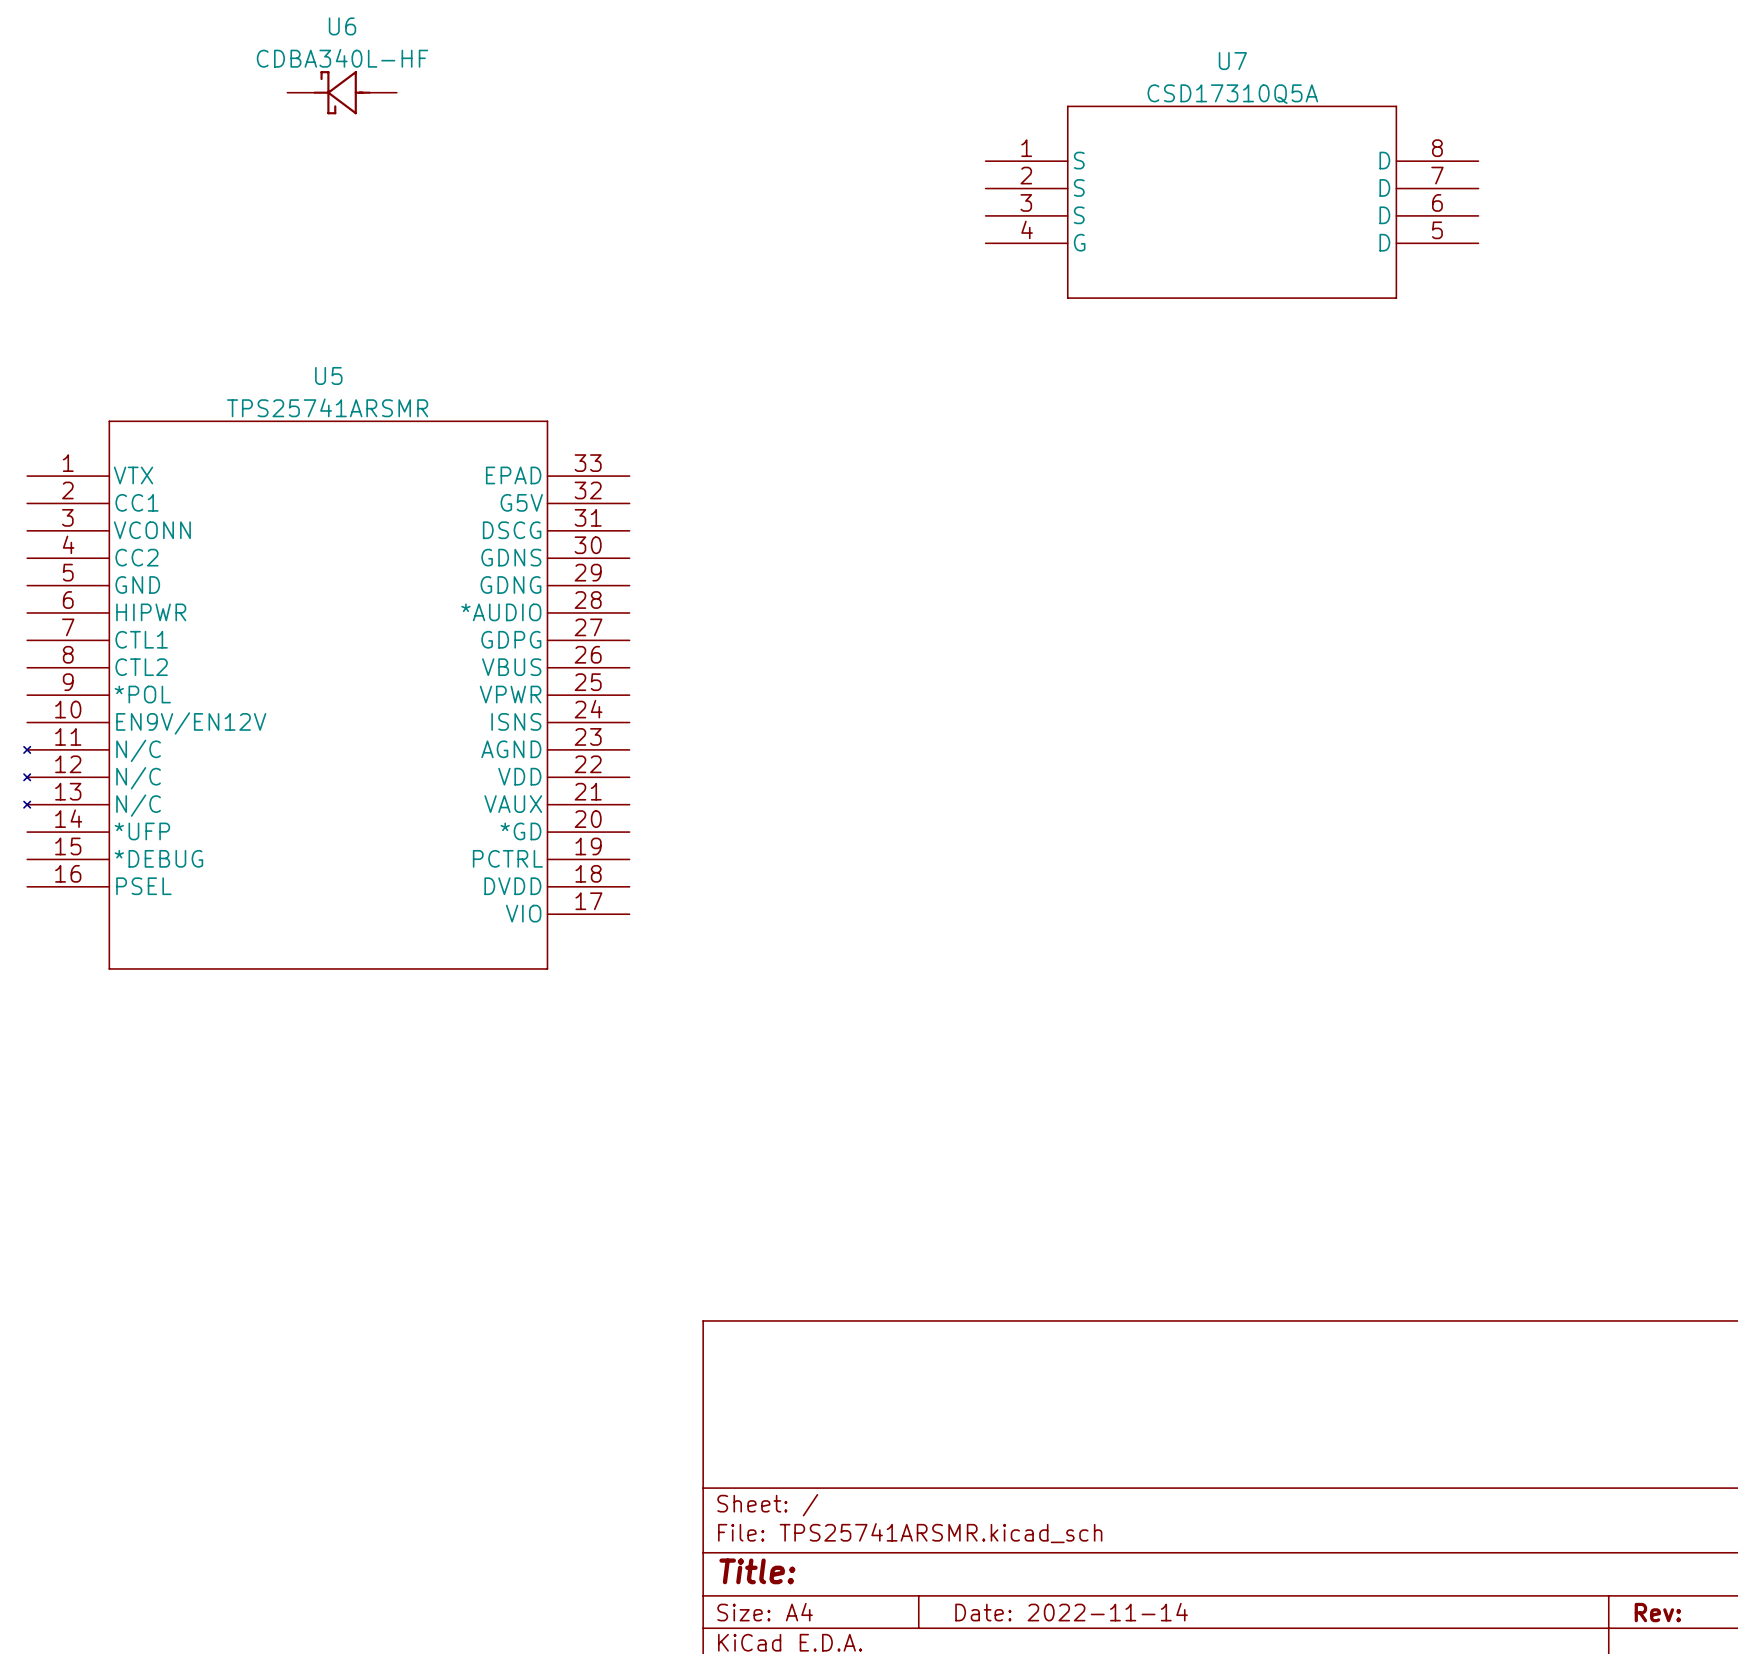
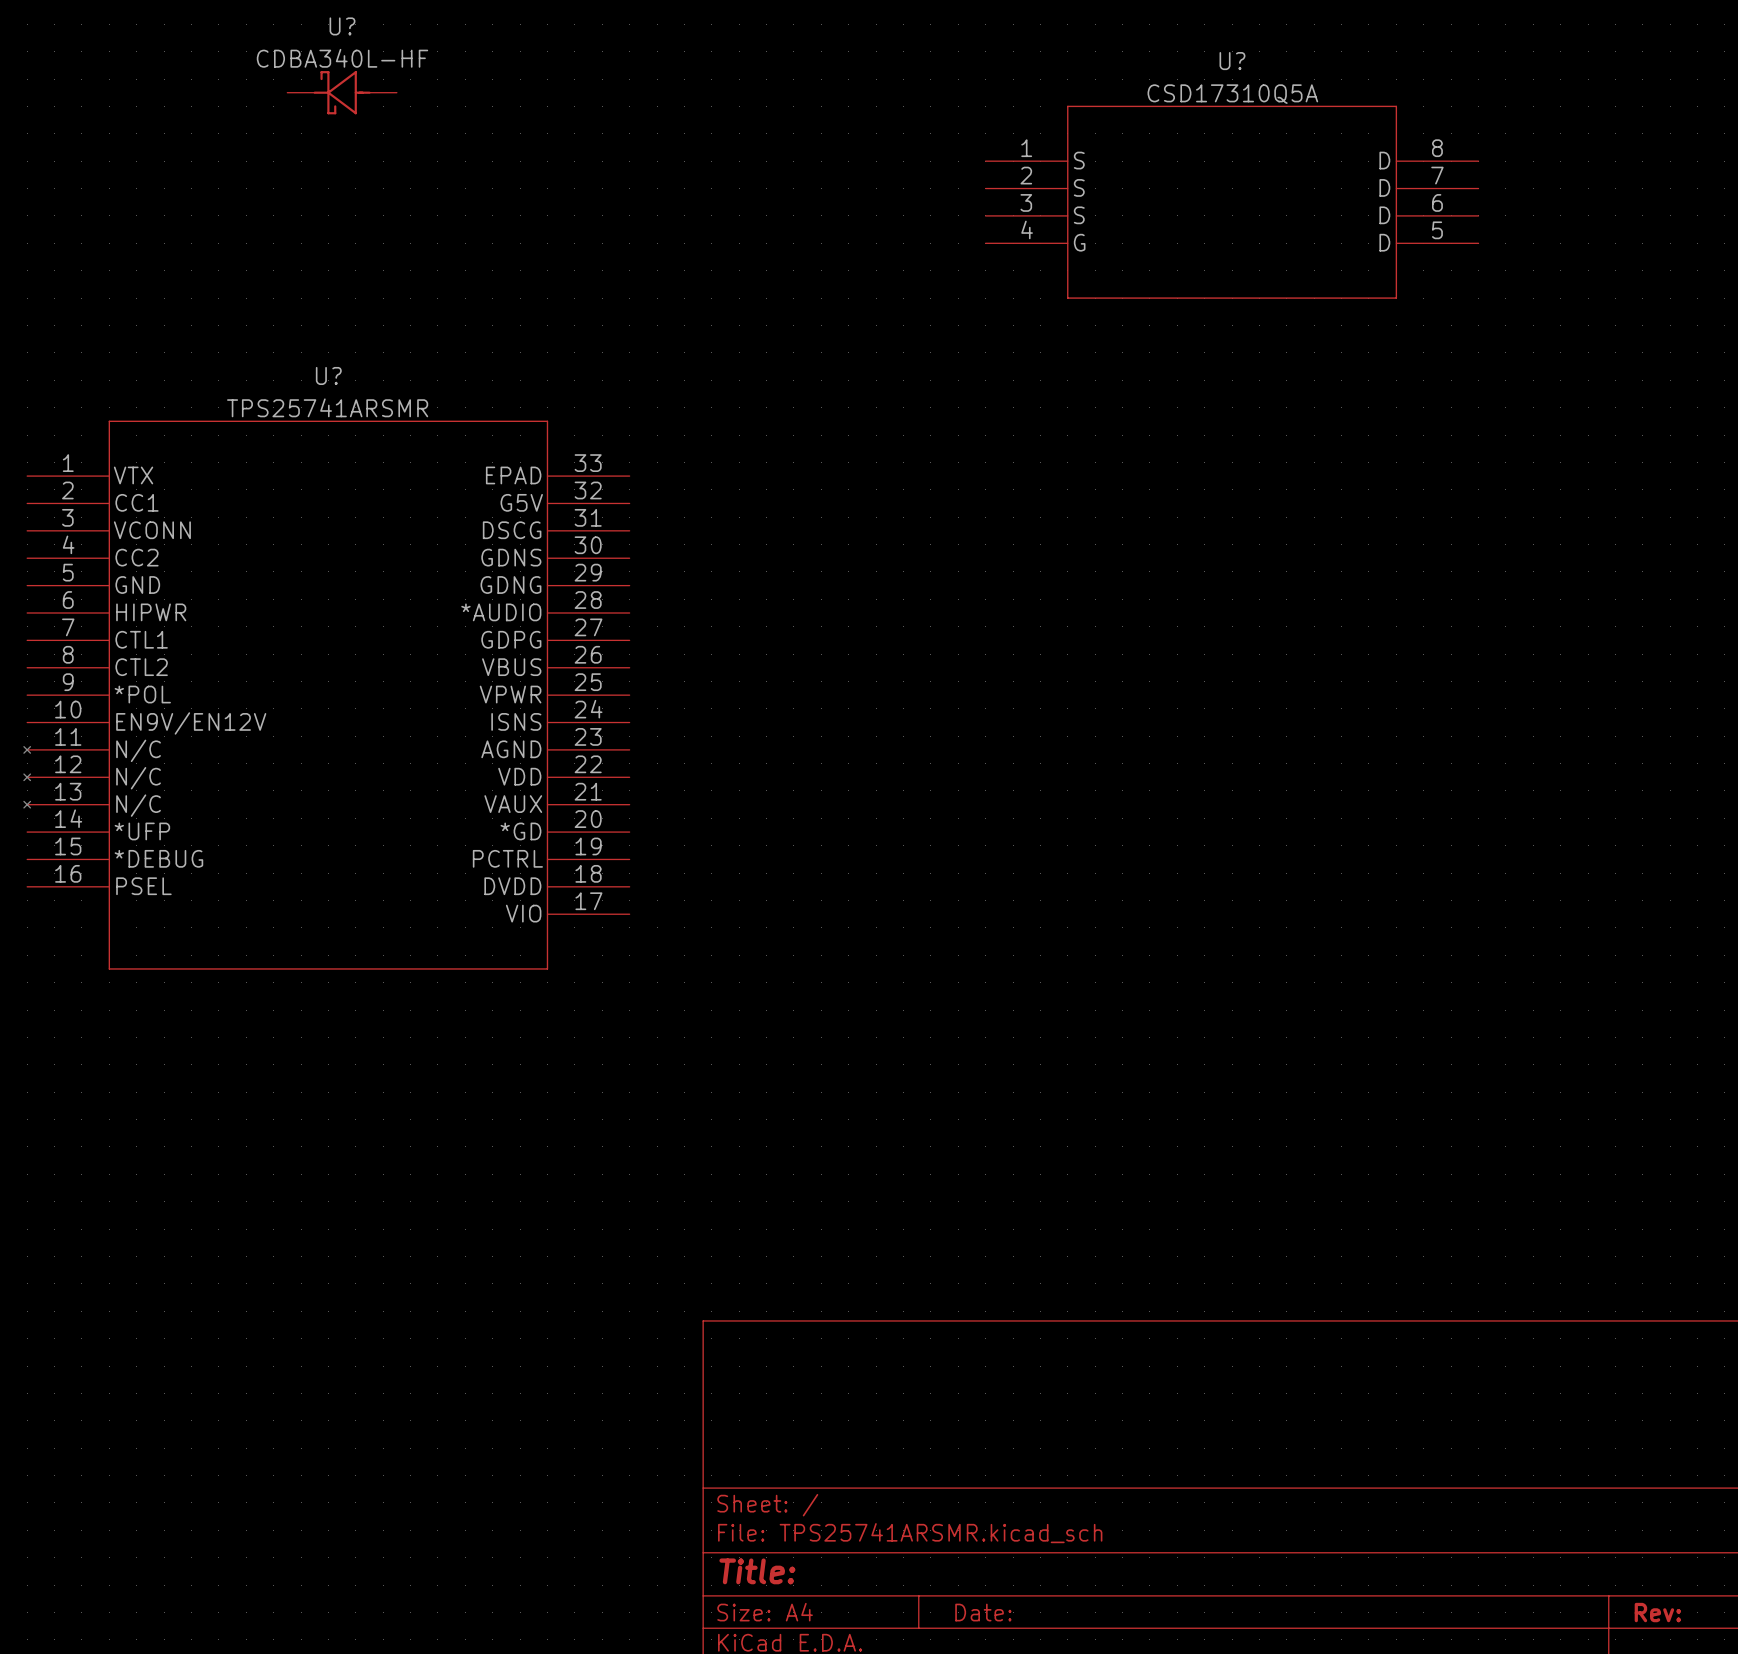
U6 name: U6 (342, 26) -> U? (342, 26)
U7 name: U7 (1232, 61) -> U? (1232, 61)
U5 name: U5 (328, 375) -> U? (328, 375)
title block: Date: 2022-11-14 (1071, 1612) -> Date: (983, 1612)

